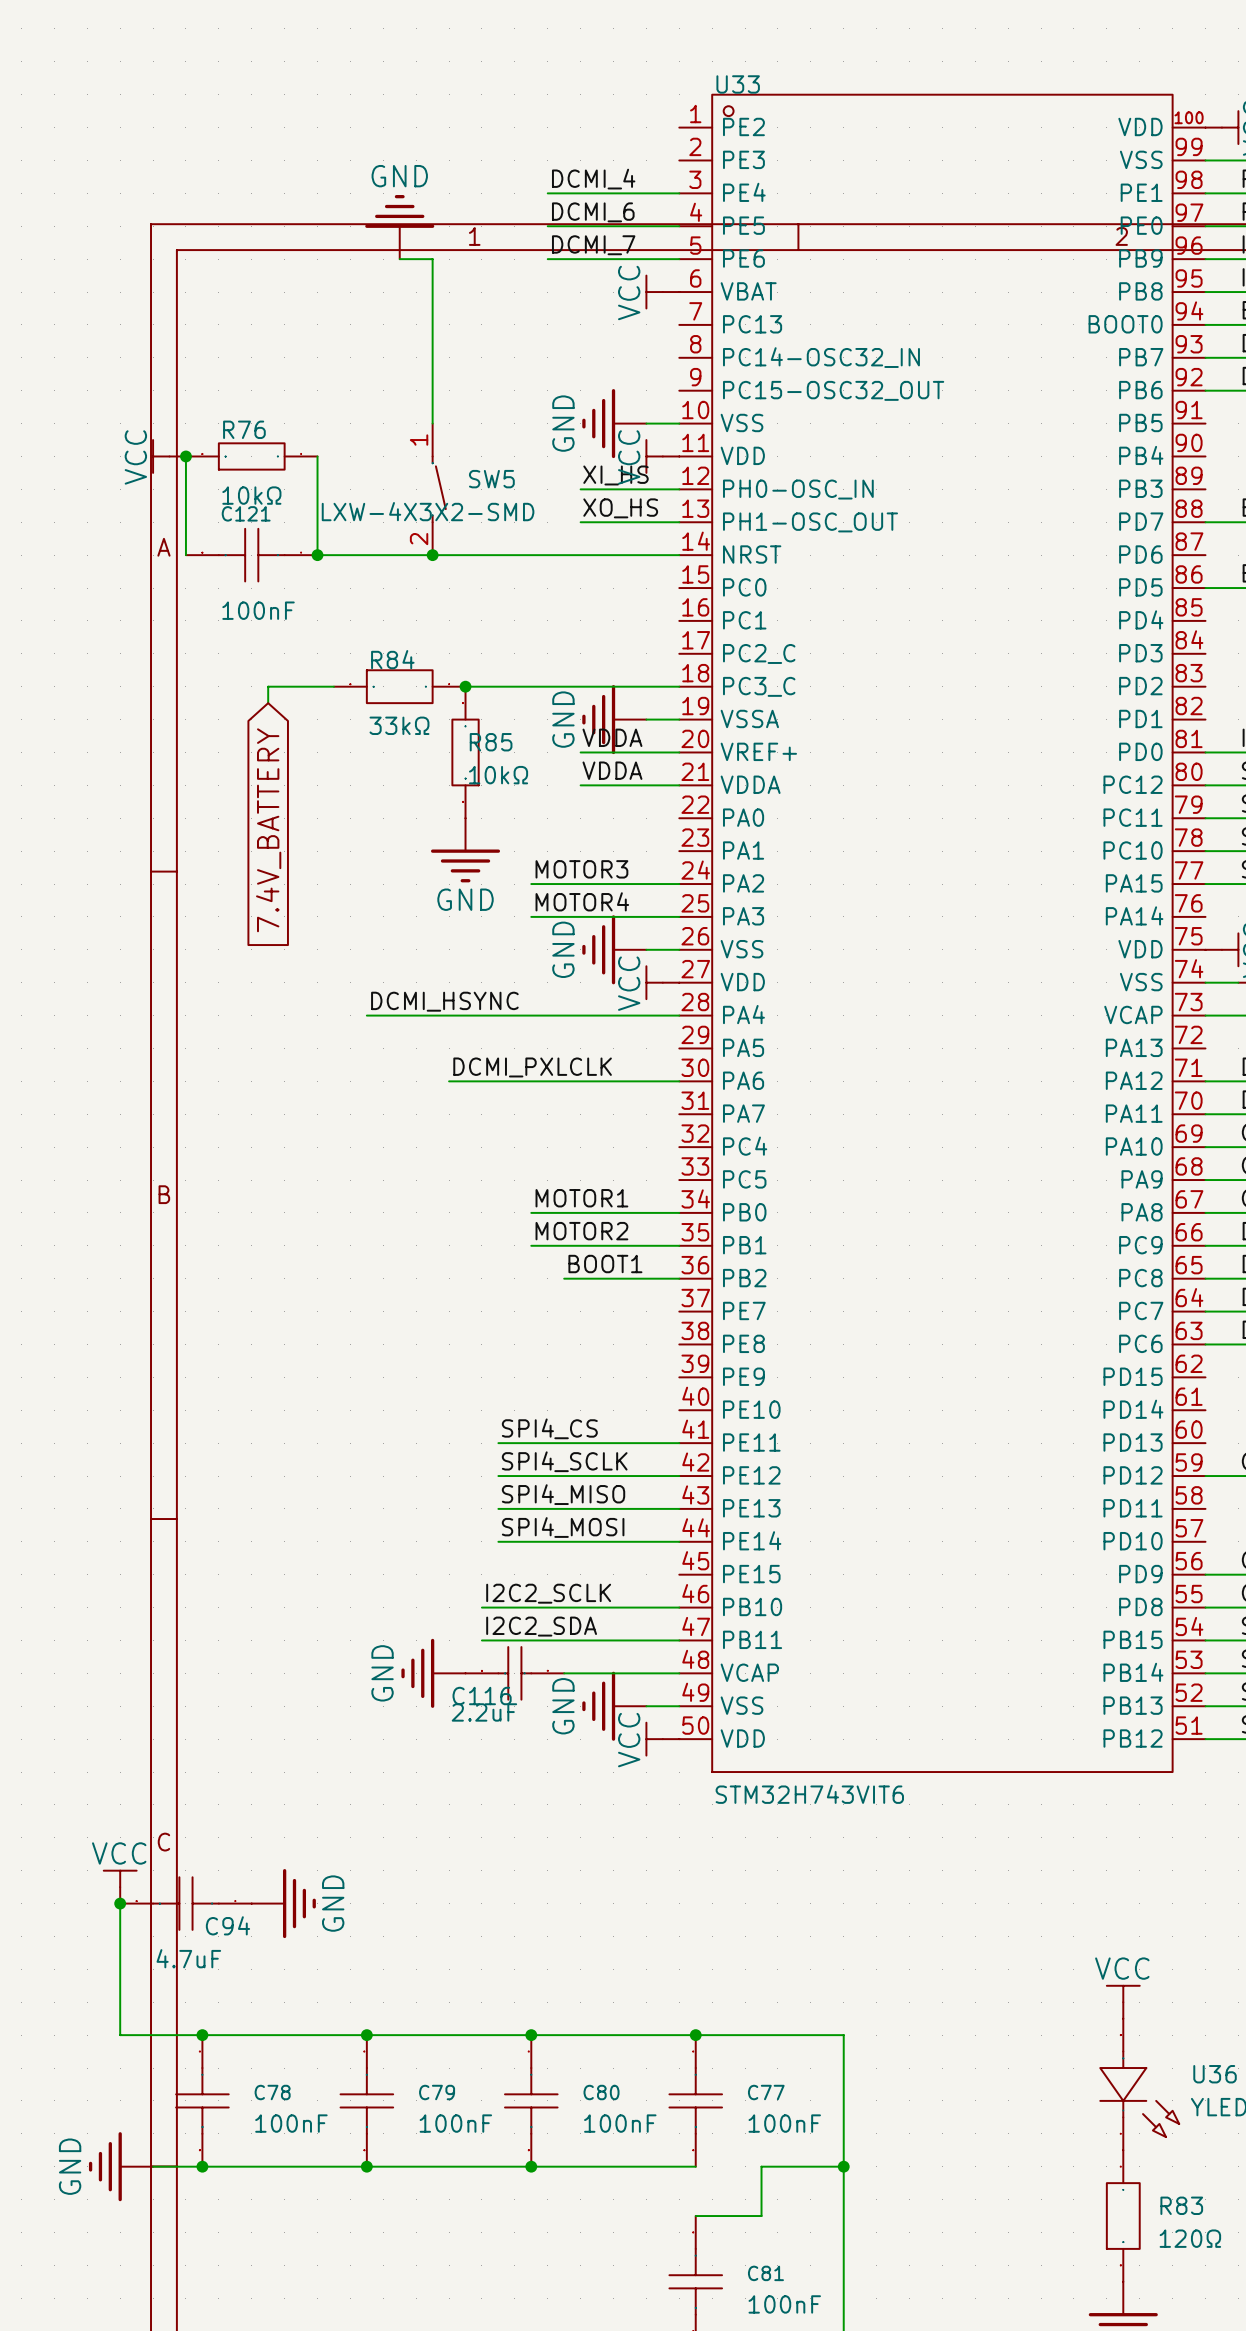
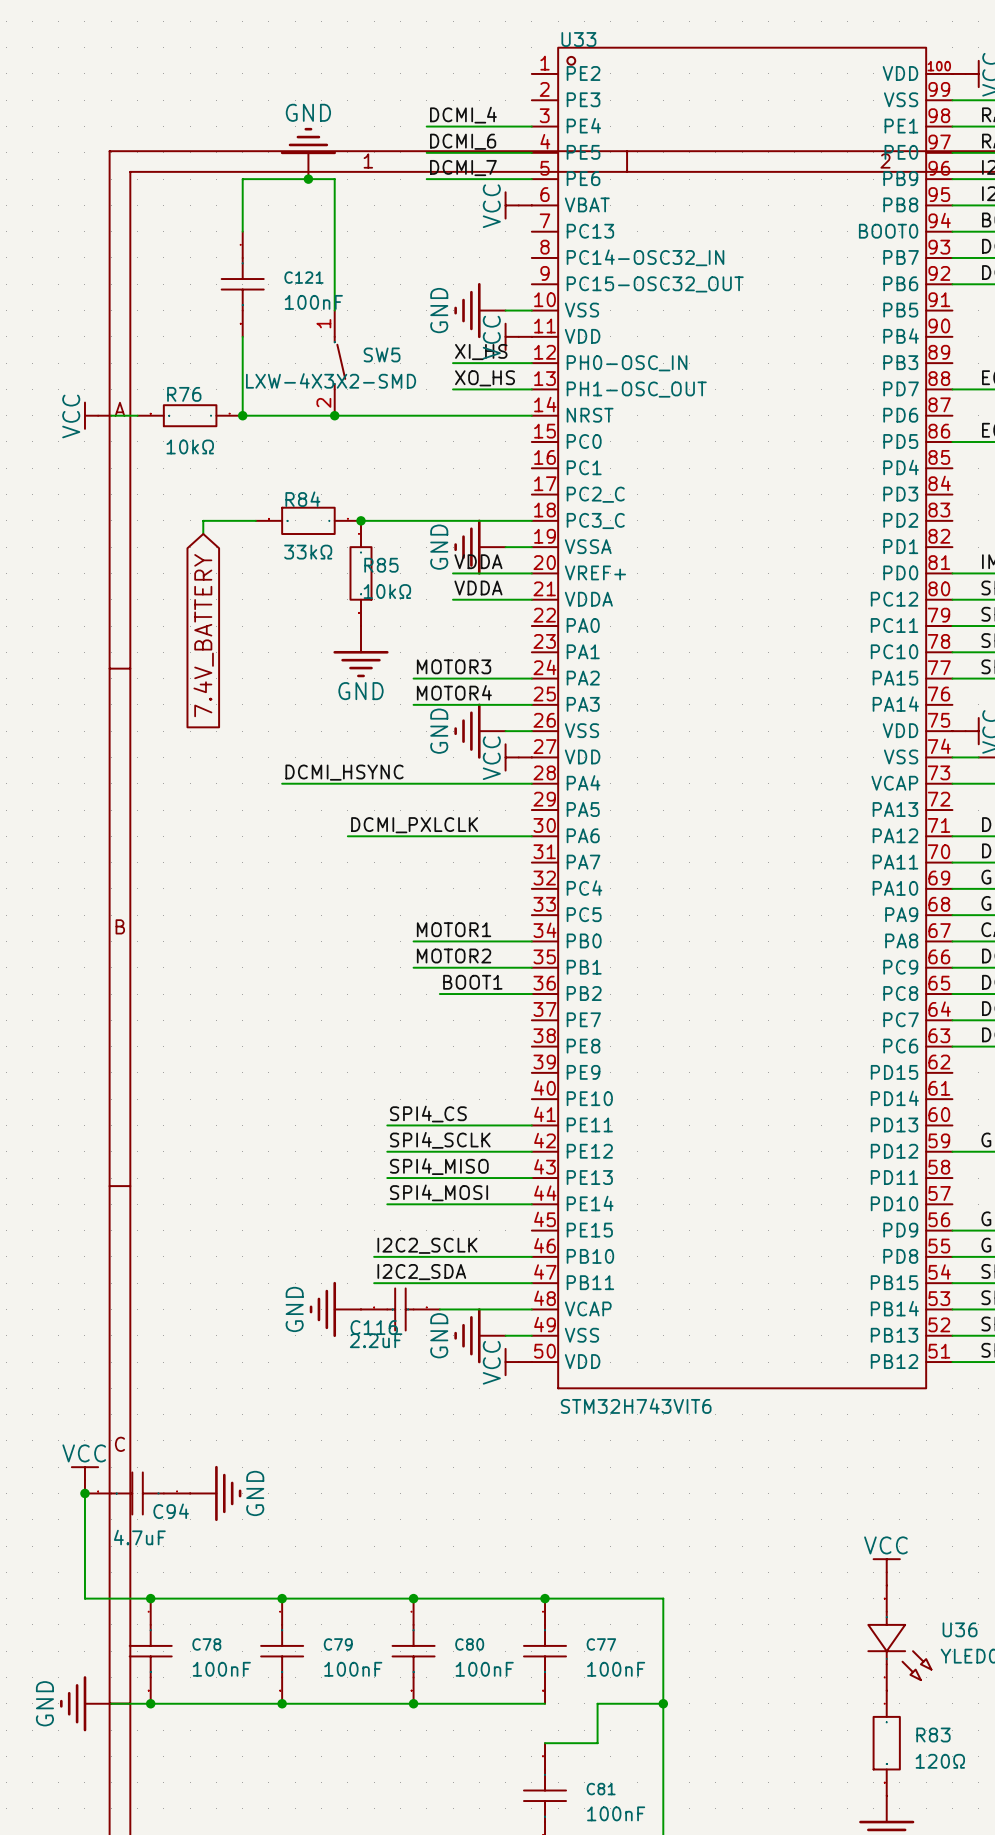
wire: none -> (308, 179) (242, 179) (242, 231)
junction: none -> (308, 179)
power symbol position: VCC (169, 456) -> VCC (98, 415)
wire: (185, 456) (185, 555) -> (111, 415) (137, 415)
junction: (185, 456) -> none
R76 position: (251, 456) -> (190, 415)
C121 name position: C121 (246, 513) -> C121 (303, 277)
C121 rotation: 0° (251, 555) -> 90° counterclockwise (242, 284)
C121 position: (251, 555) -> (242, 284)
C121 value position: 100nF (258, 610) -> 100nF (313, 302)

